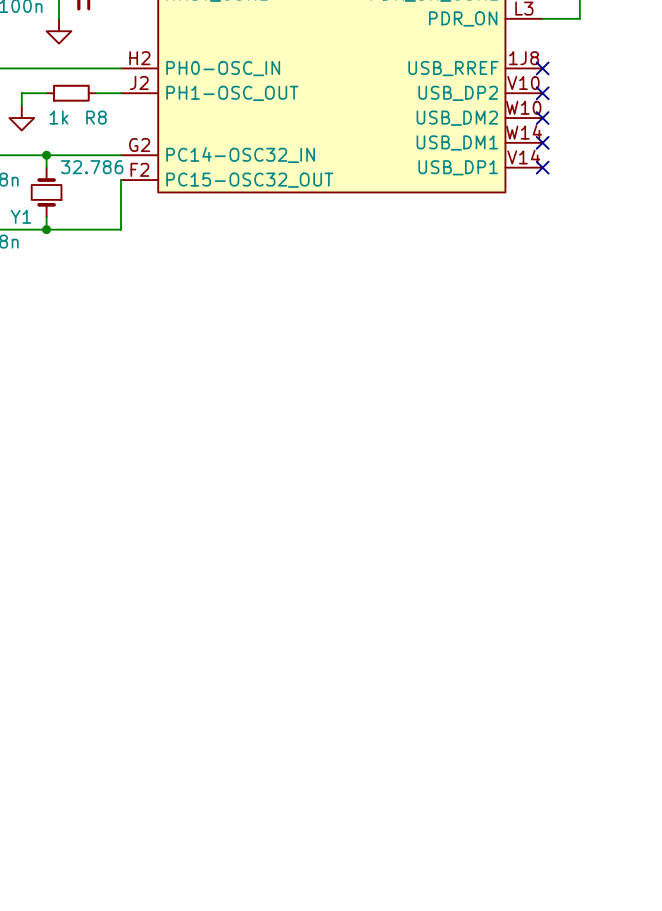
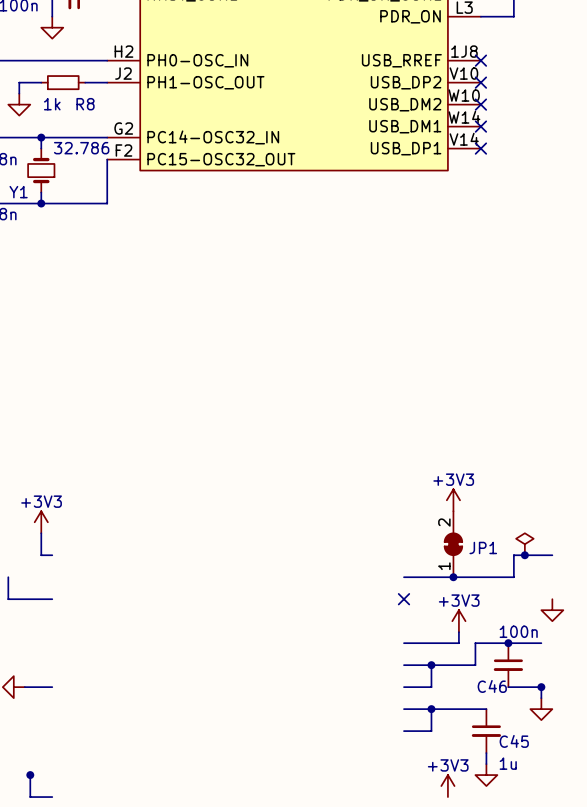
power symbol: none -> +3V3 (453, 500)
power symbol: none -> +3V3 (41, 522)
wire: none -> (41, 533) (41, 555) (52, 555)
JP1: none -> (453, 544)
power symbol: none -> (524, 544)
junction: none -> (524, 555)
wire: none -> (552, 555) (513, 555) (513, 577) (403, 577)
wire: none -> (8, 577) (8, 599) (52, 599)
junction: none -> (453, 577)
no-connect mark: none -> (403, 599)
power symbol: none -> (552, 610)
power symbol: none -> +3V3 (458, 621)
wire: none -> (458, 632) (458, 643) (403, 643)
junction: none -> (508, 643)
wire: none -> (541, 643) (475, 643) (475, 665) (403, 665)
wire: none -> (431, 665) (431, 687) (403, 687)
junction: none -> (431, 665)
C46: none -> 100n (508, 665)
power symbol: none -> (13, 687)
wire: none -> (24, 687) (52, 687)
wire: none -> (508, 687) (541, 687) (541, 698)
junction: none -> (541, 687)
wire: none -> (403, 709) (486, 709)
wire: none -> (431, 709) (431, 731) (403, 731)
junction: none -> (431, 709)
power symbol: none -> (541, 709)
C45: none -> 1u (486, 731)
wire: none -> (486, 753) (486, 764)
wire: none -> (30, 775) (30, 797) (52, 797)
junction: none -> (30, 775)
power symbol: none -> (486, 775)
power symbol: none -> +3V3 (447, 786)

